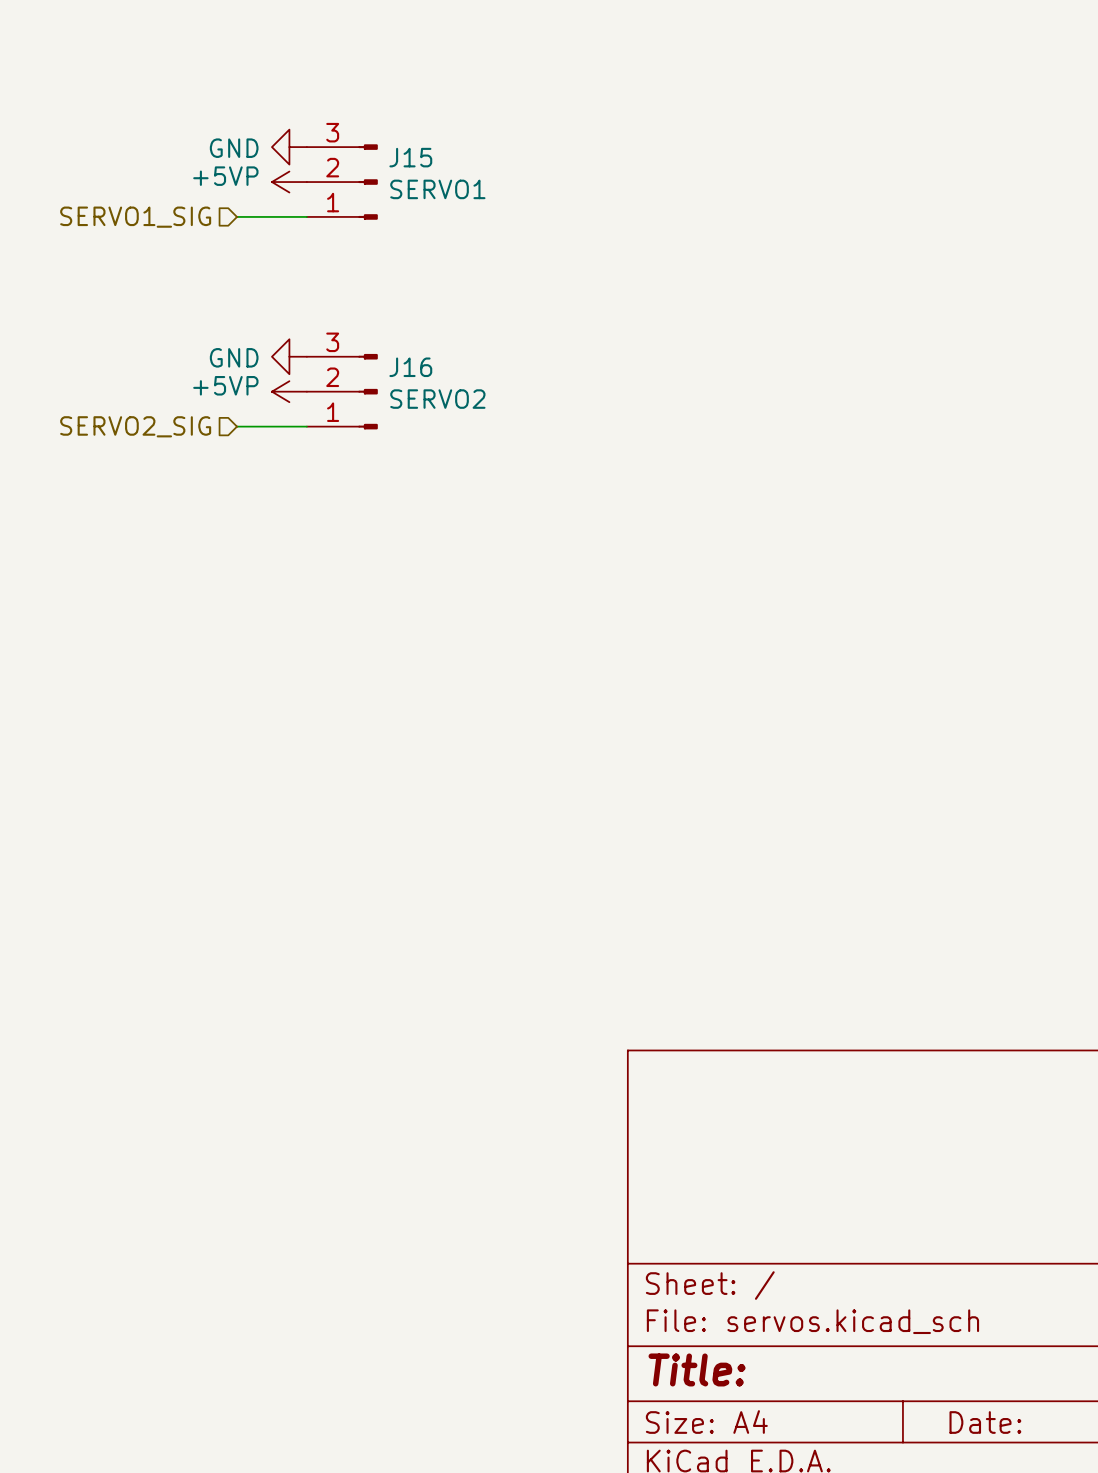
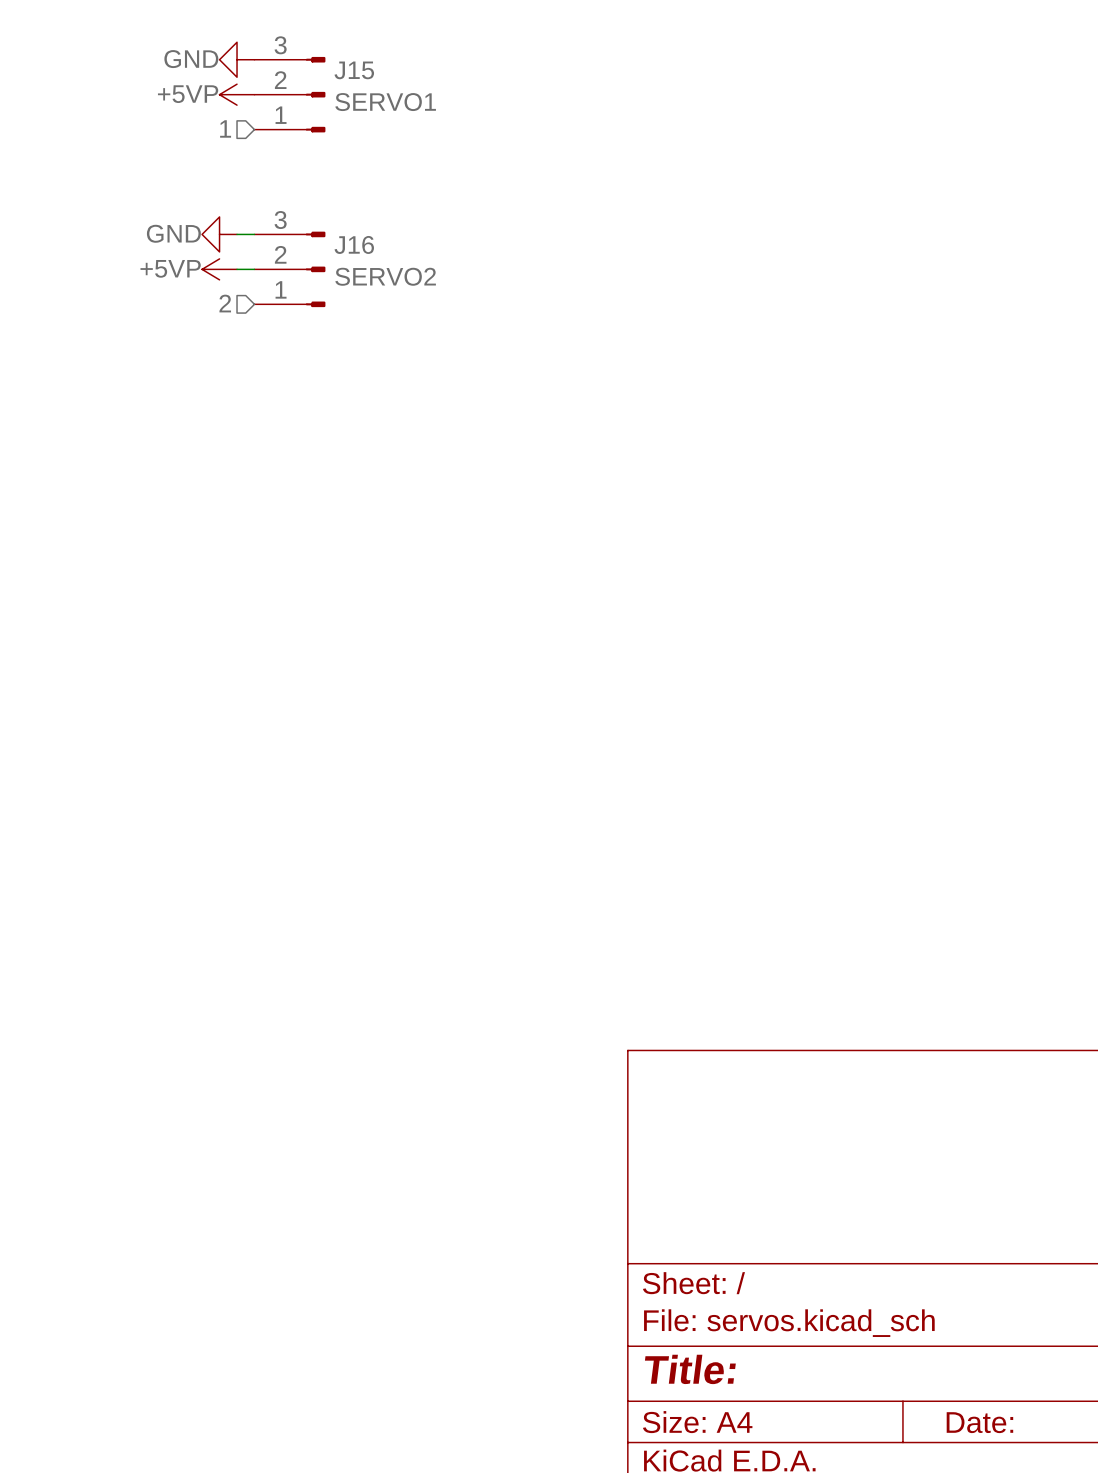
power symbol: none -> GND (237, 59)
power symbol: none -> +5VP (237, 94)
hierarchical label: none -> 1 (225, 128)
power symbol: GND (289, 147) -> none
power symbol: +5VP (289, 182) -> none
J15 position: (342, 182) -> (289, 94)
wire: (237, 216) (306, 216) -> none
hierarchical label: SERVO1_SIG (135, 217) -> none
power symbol: none -> GND (219, 234)
wire: none -> (237, 234) (254, 234)
power symbol: none -> +5VP (219, 269)
wire: none -> (237, 269) (254, 269)
hierarchical label: none -> 2 (225, 303)
power symbol: GND (289, 356) -> none
power symbol: +5VP (289, 391) -> none
J16 position: (342, 391) -> (289, 269)
hierarchical label: SERVO2_SIG (135, 426) -> none
wire: (237, 426) (306, 426) -> none

